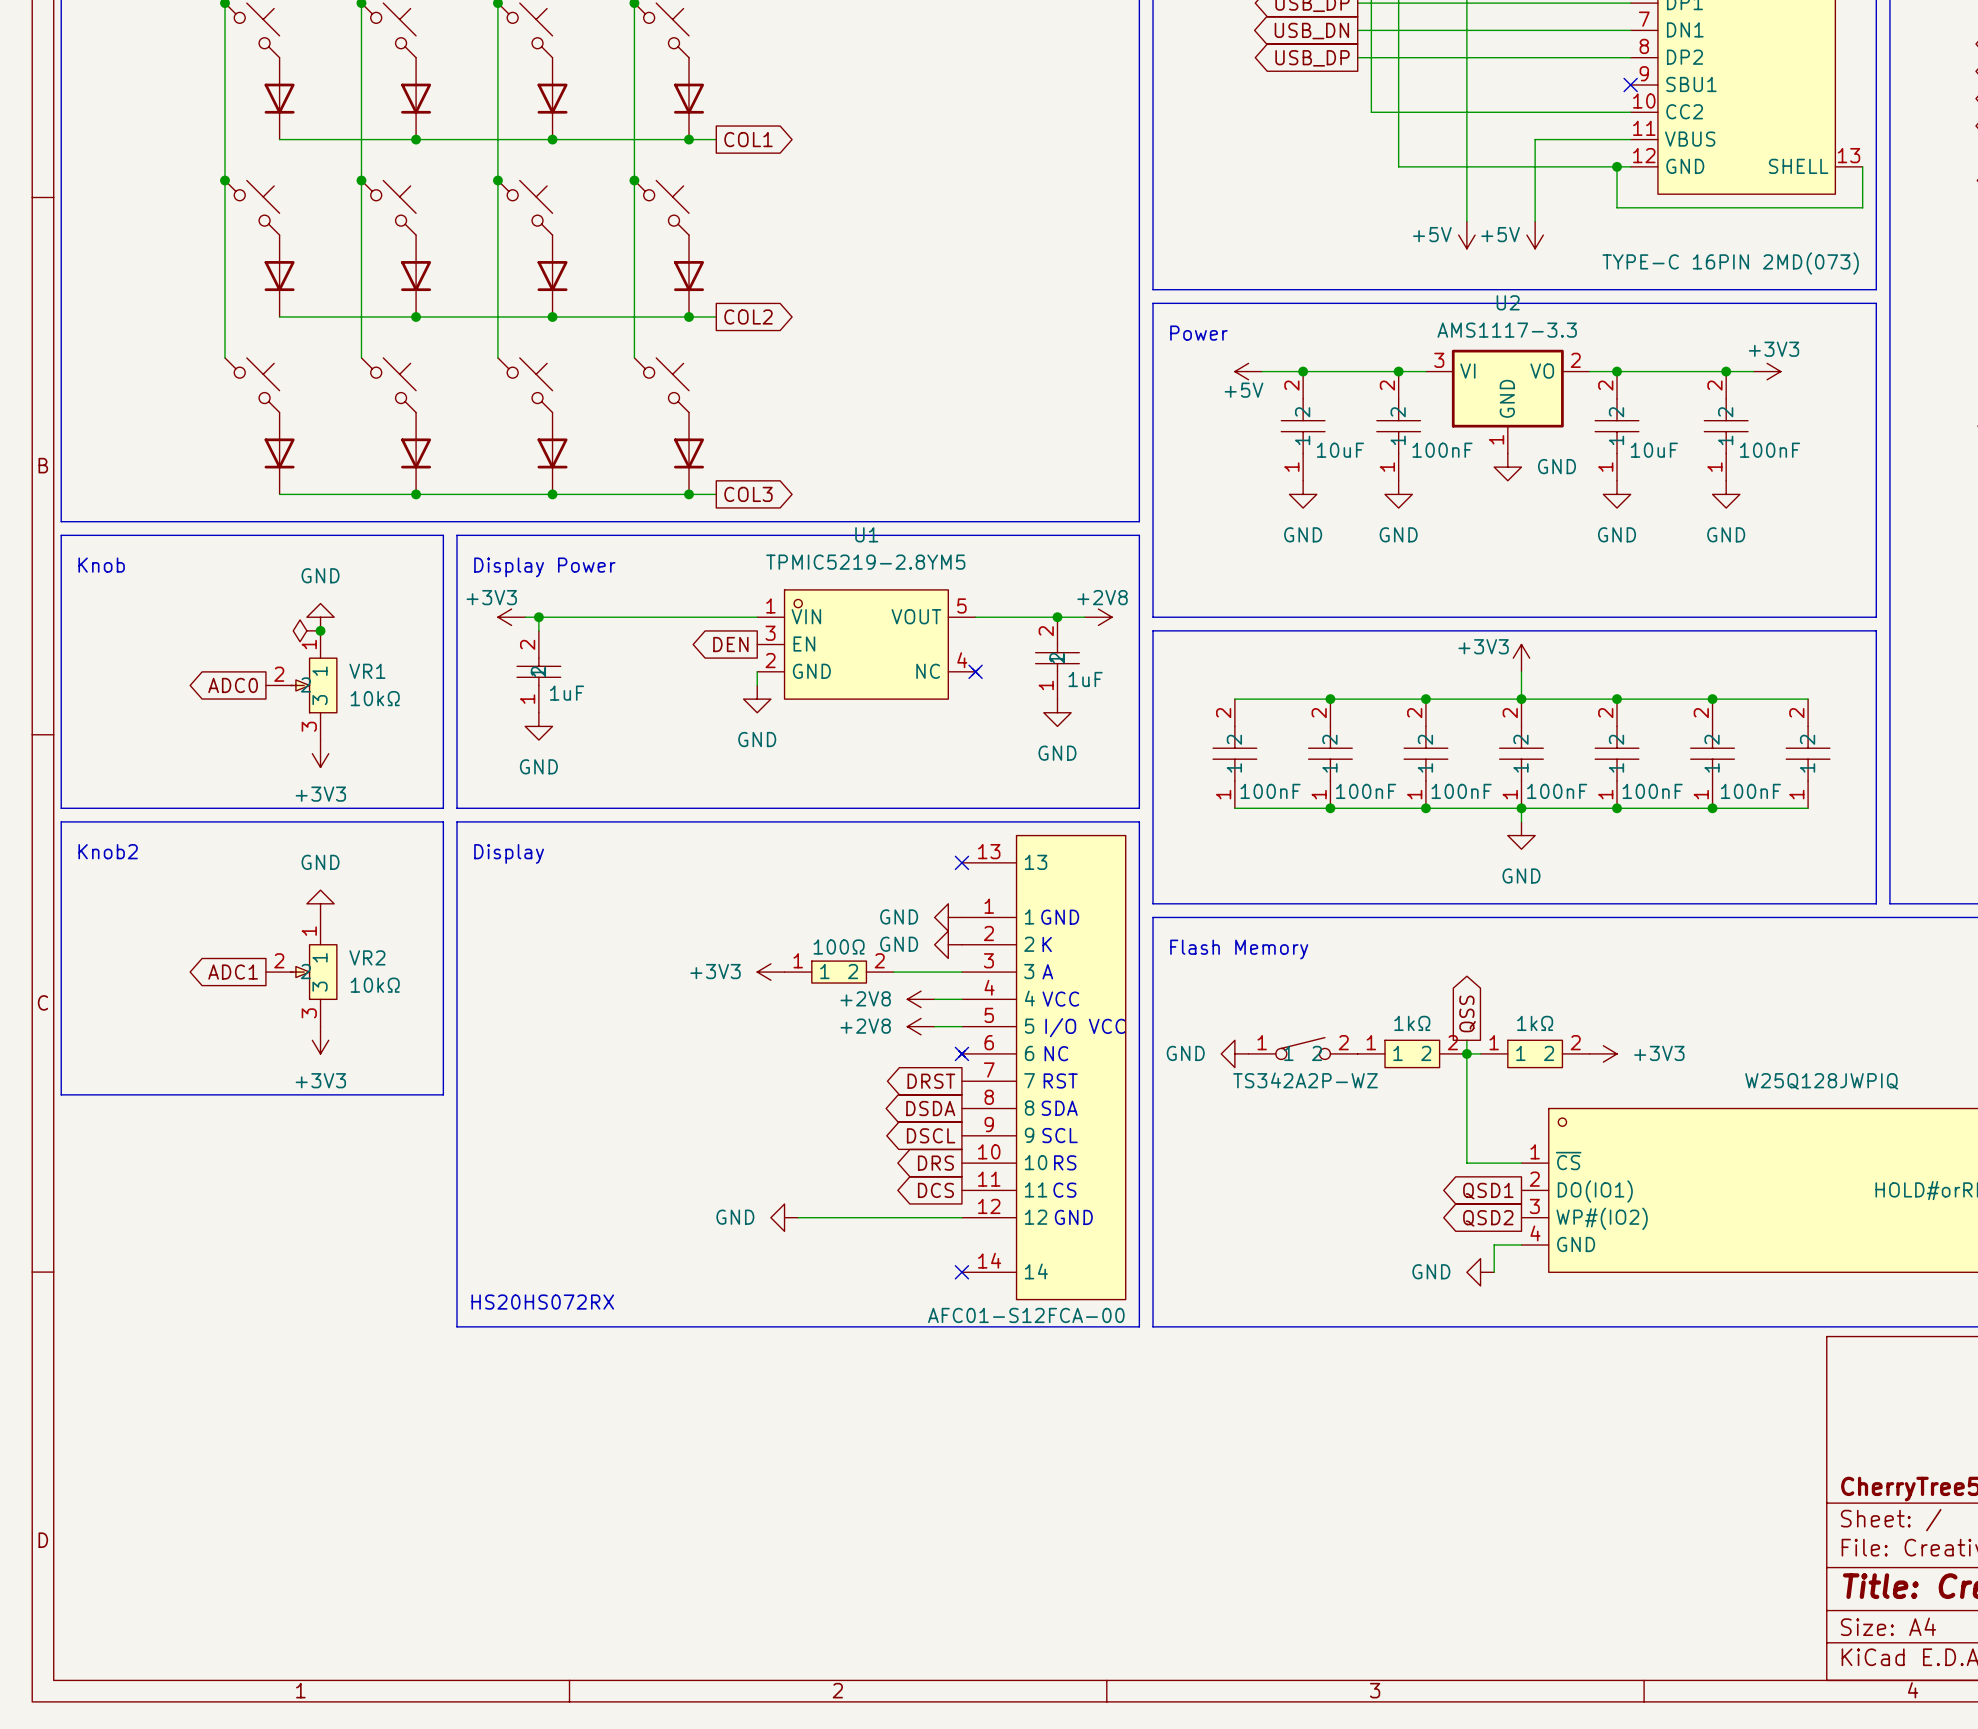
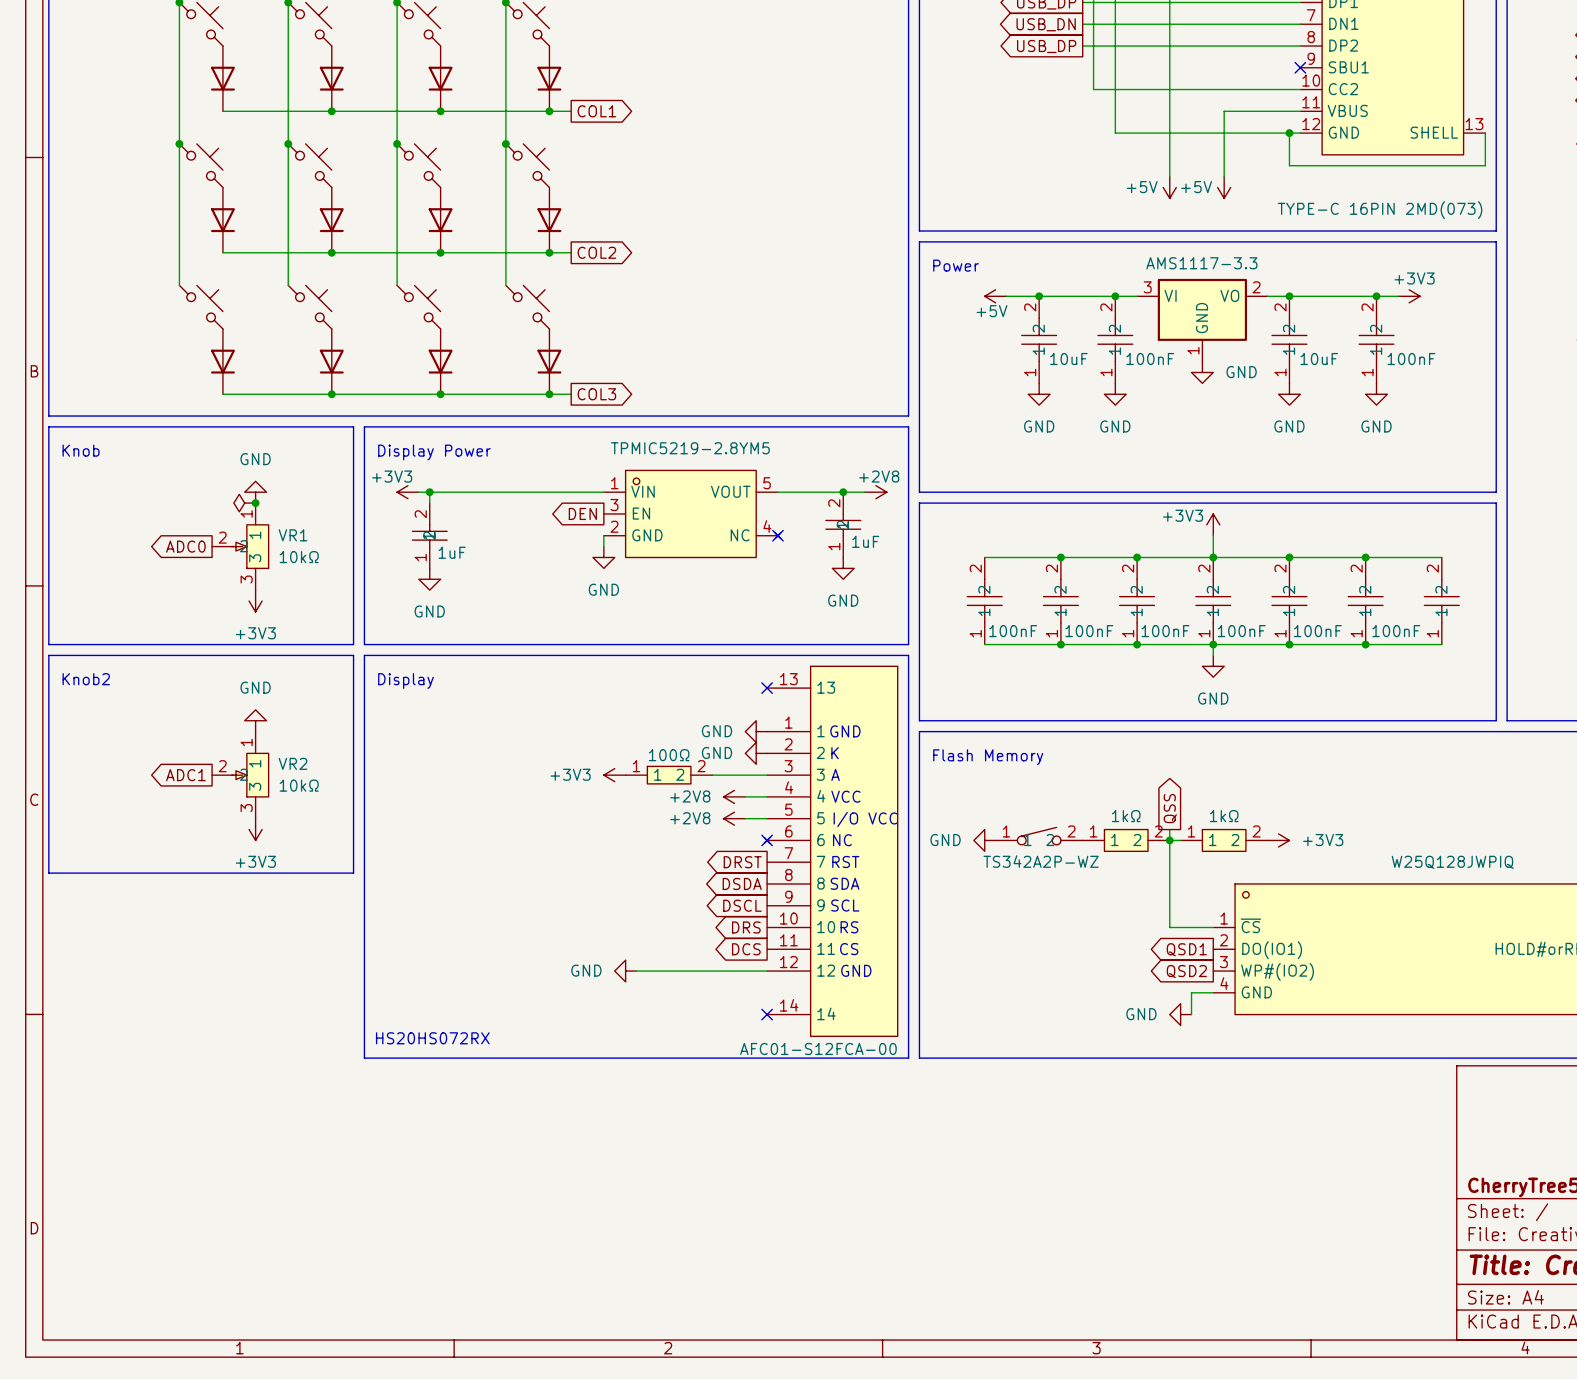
U2 name: U2 (1508, 302) -> none
U1 name: U1 (866, 534) -> none

